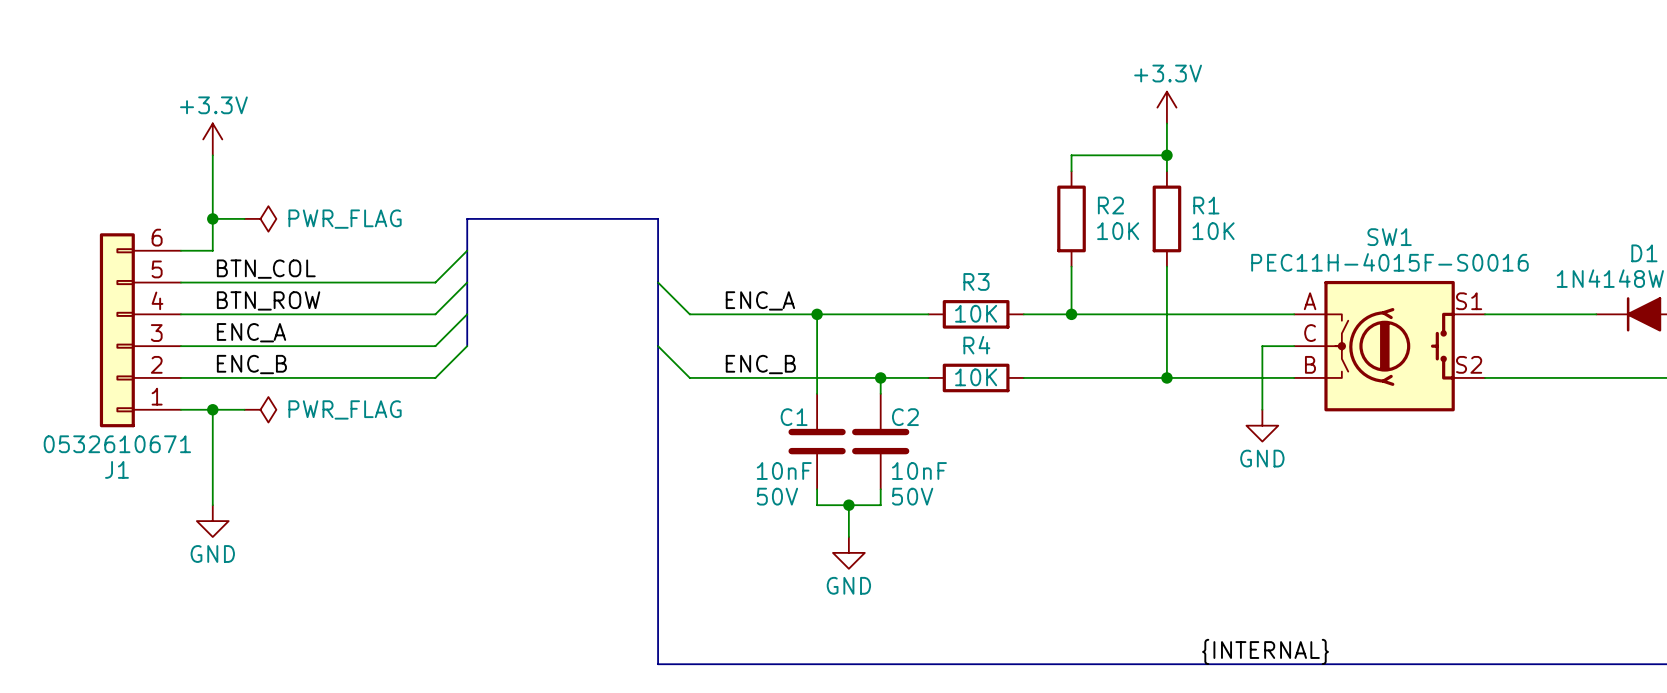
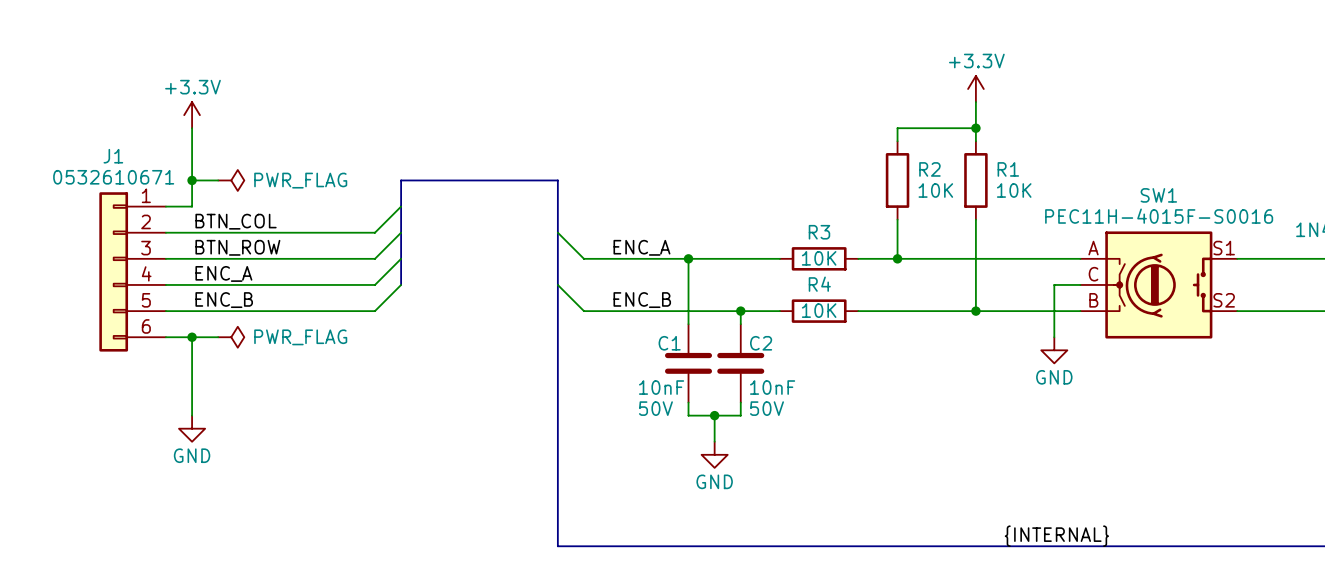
J1 flip: as is (117, 330) -> up-down (113, 271)

